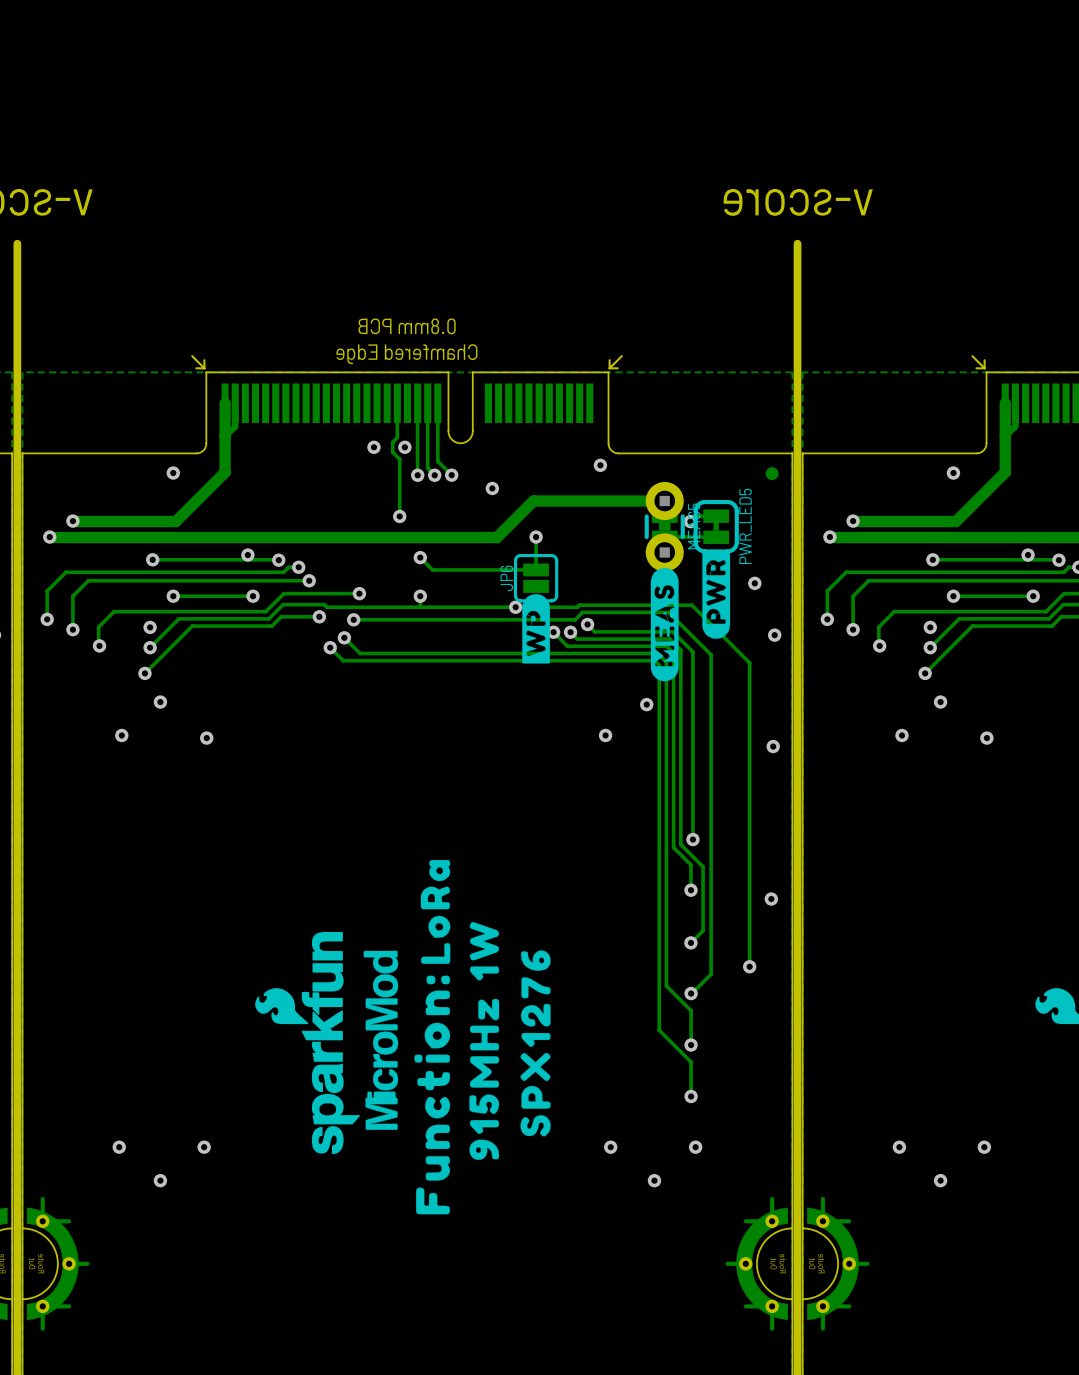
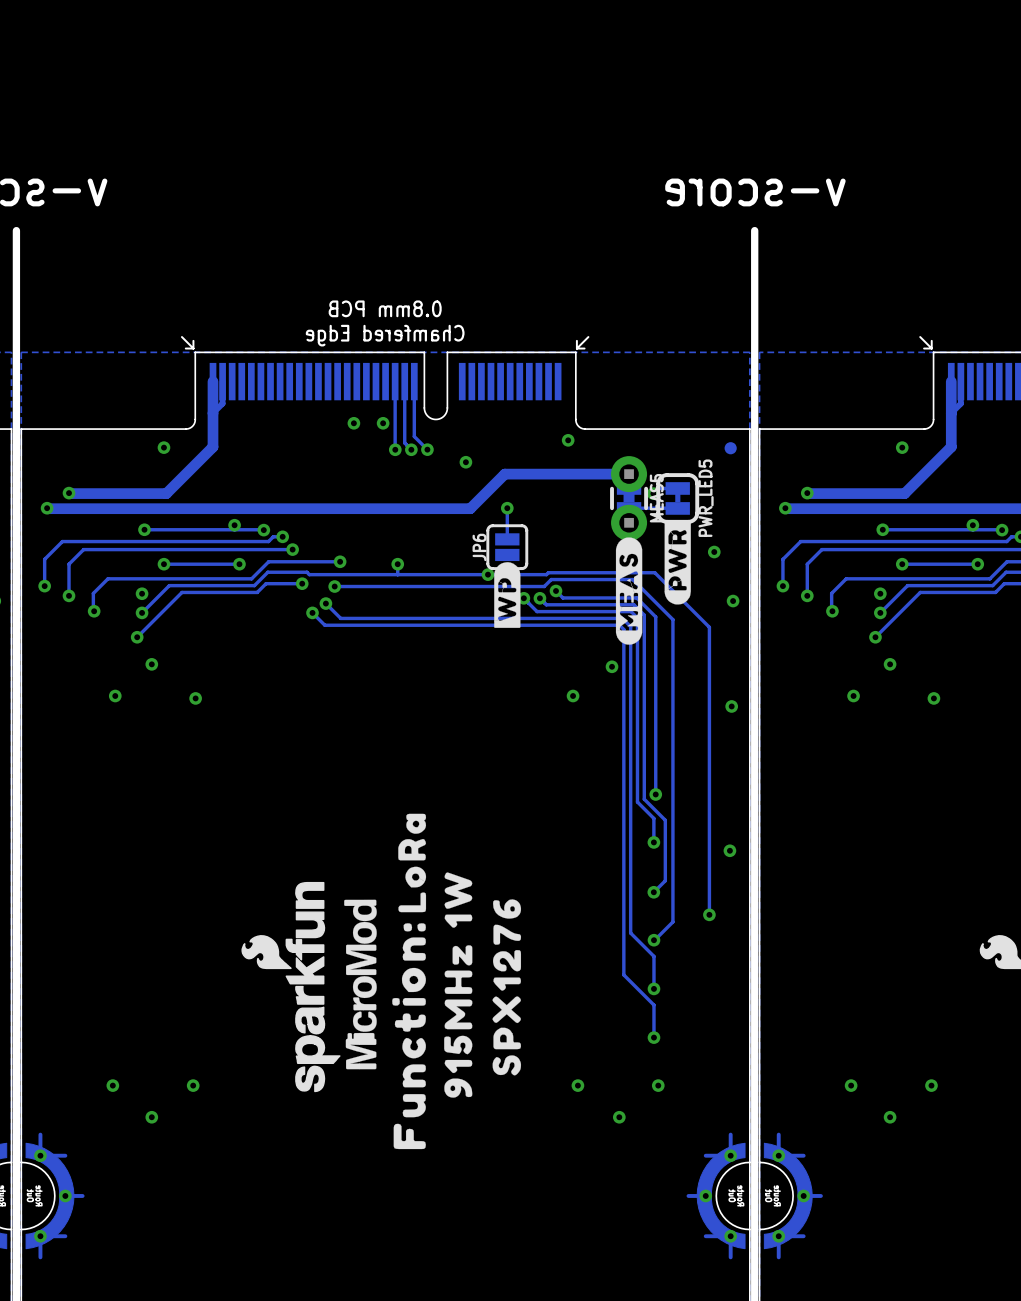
track: (397, 403) (397, 437) (392, 442) (392, 452) (399, 459) (399, 516) -> none
via: (399, 516) -> none
track: (420, 557) (432, 569) (536, 569) -> none
via: (420, 557) -> none

